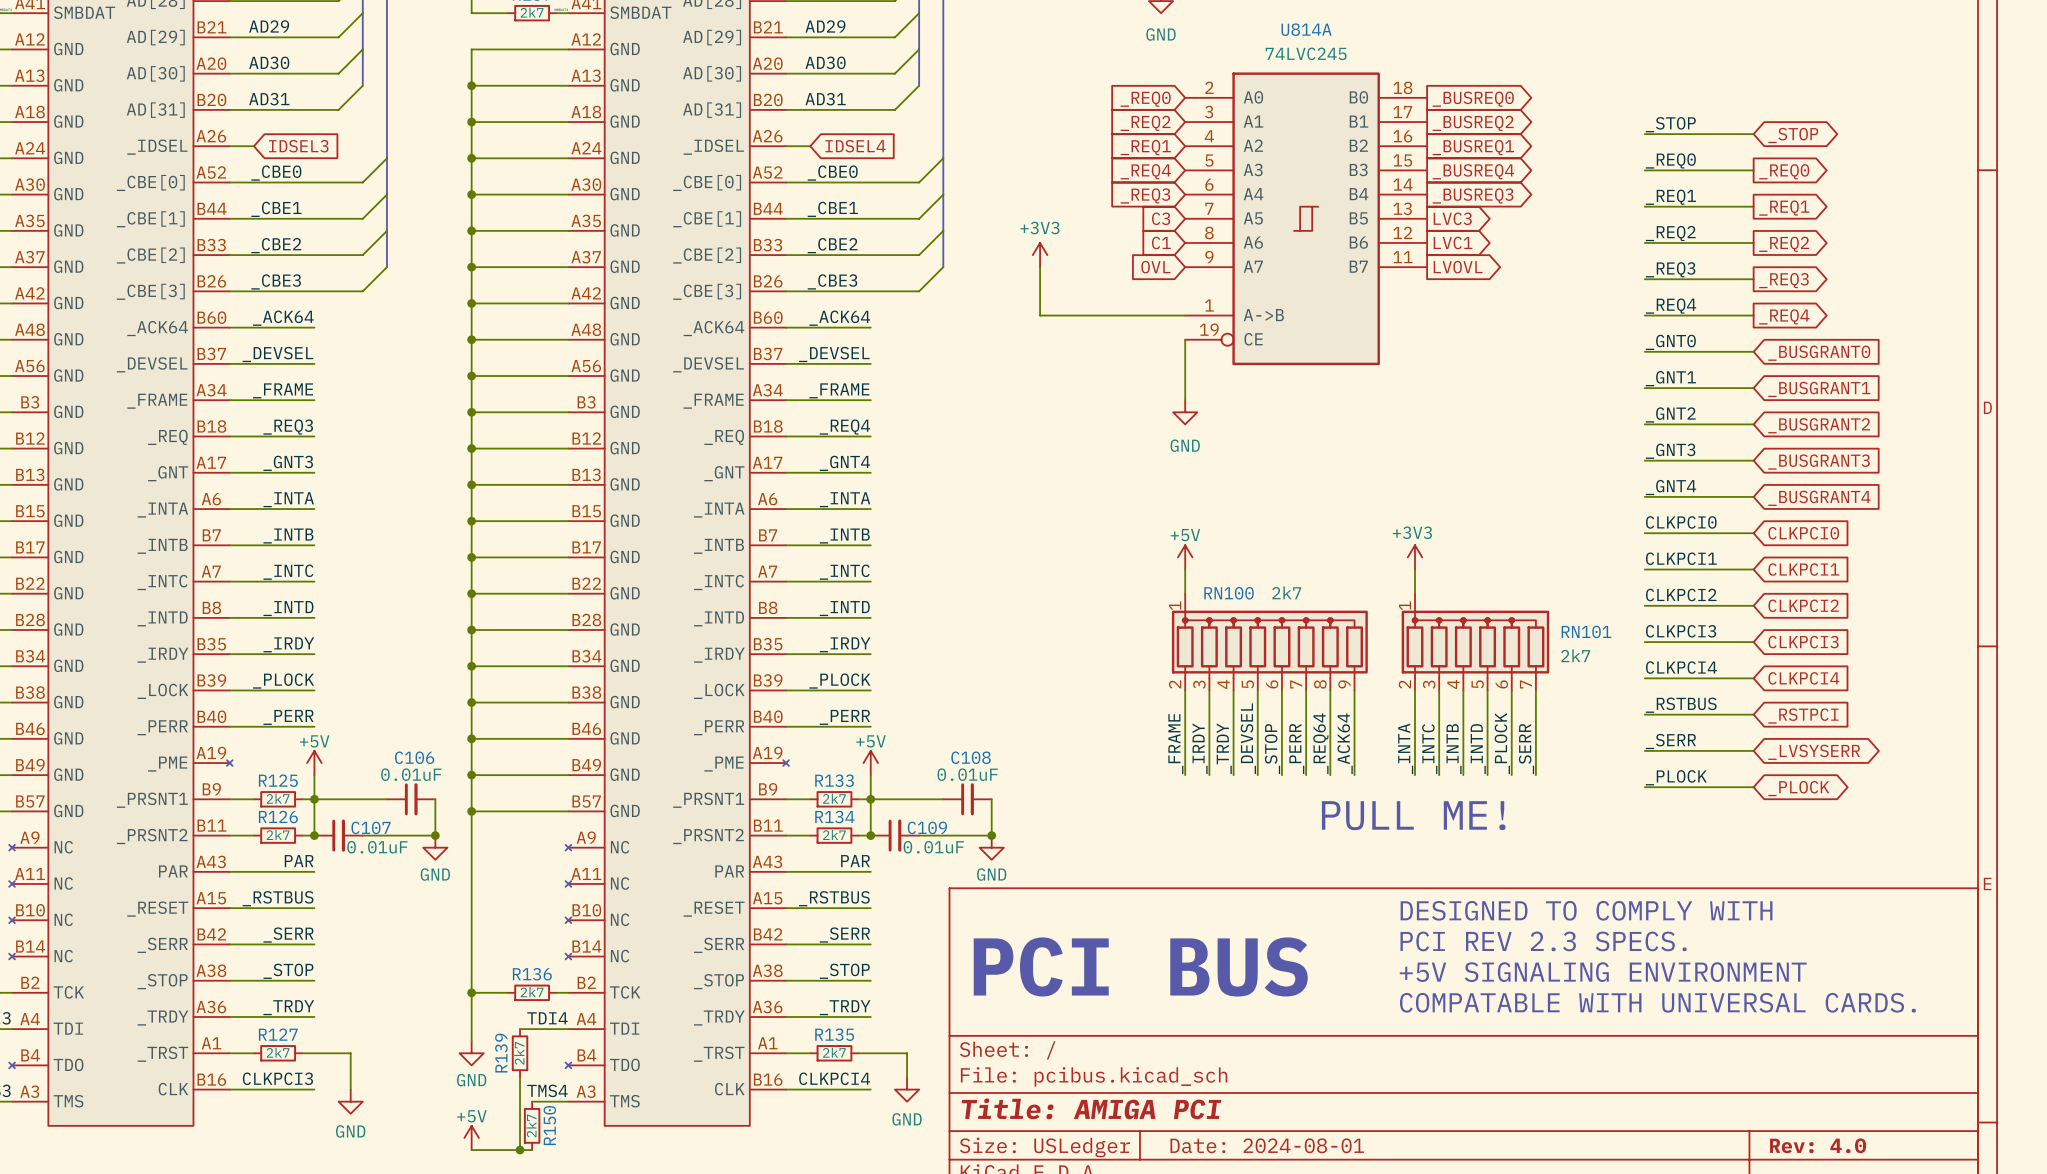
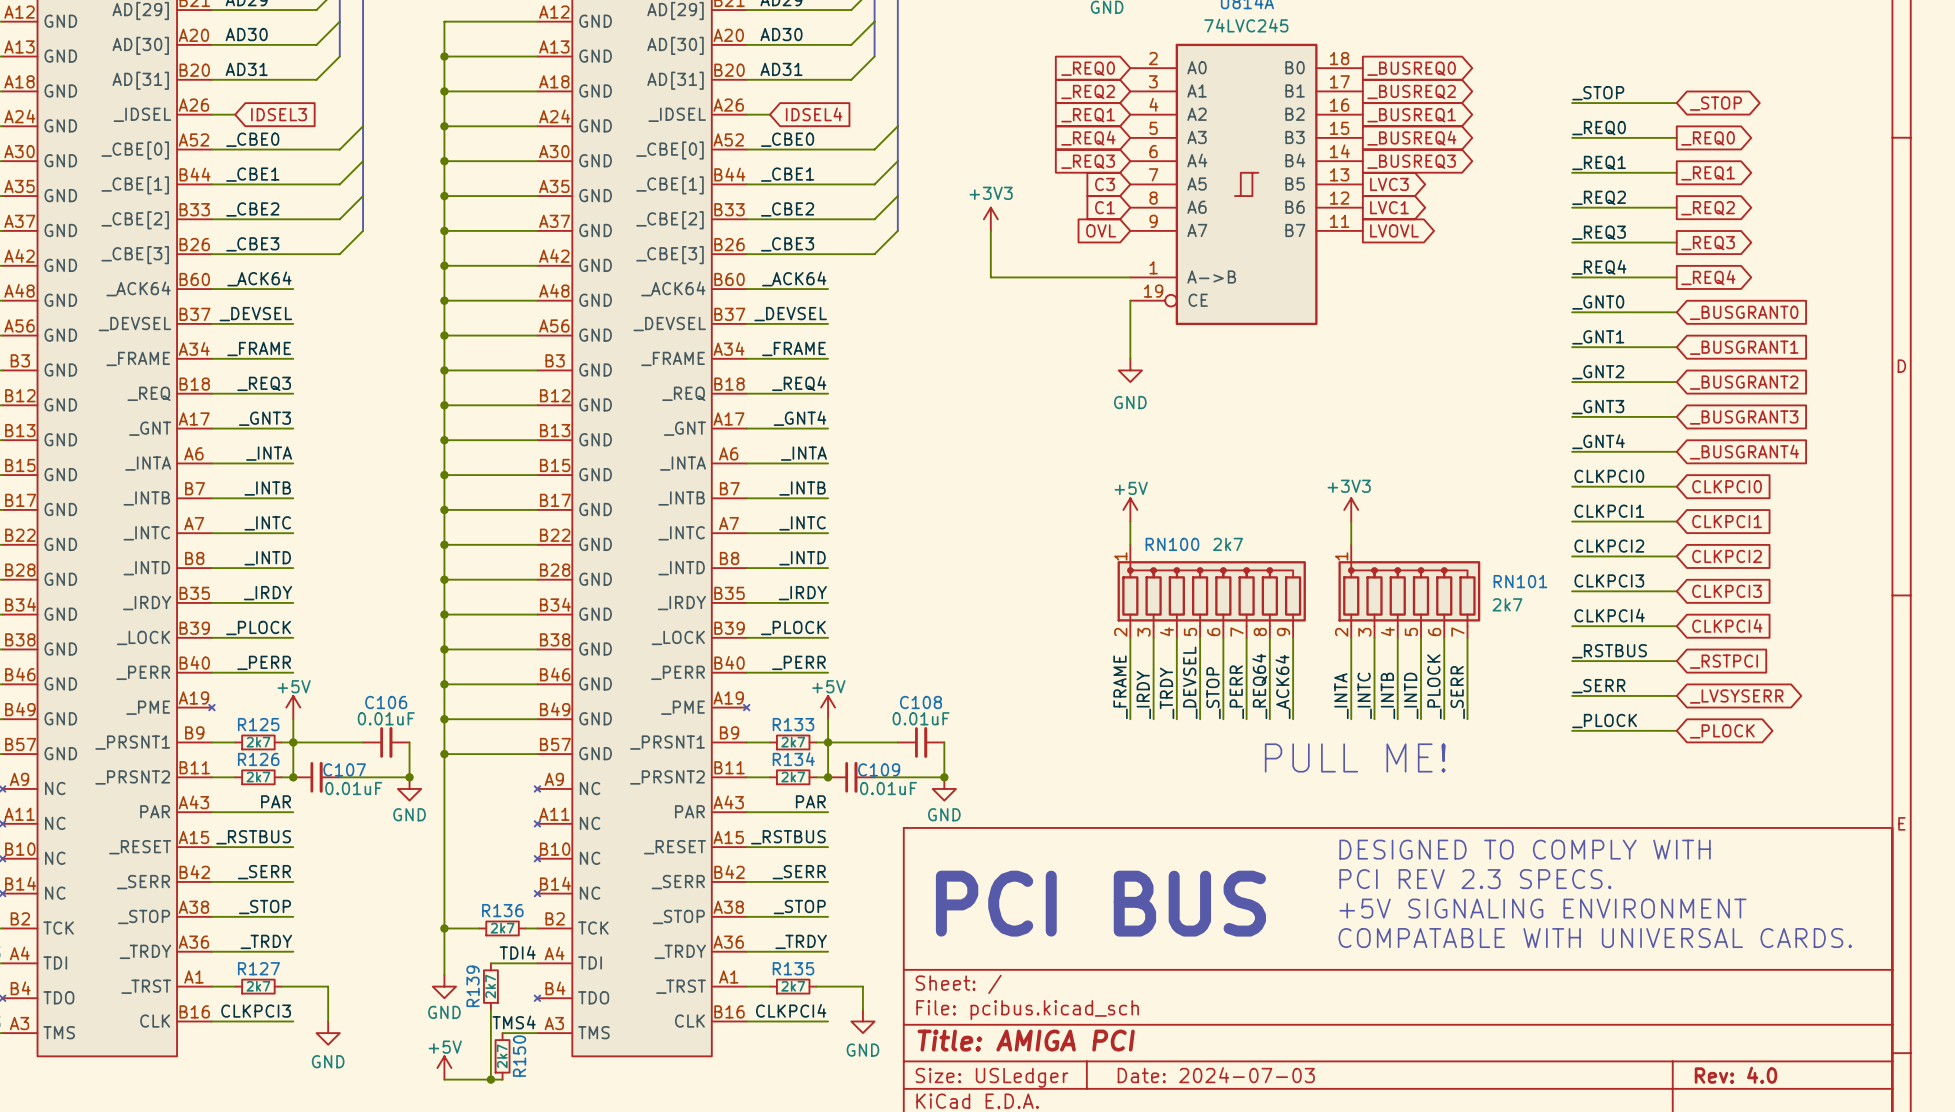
title block: Date: 2024-08-01 (1267, 1145) -> Date: 2024-07-03 (1216, 1075)

